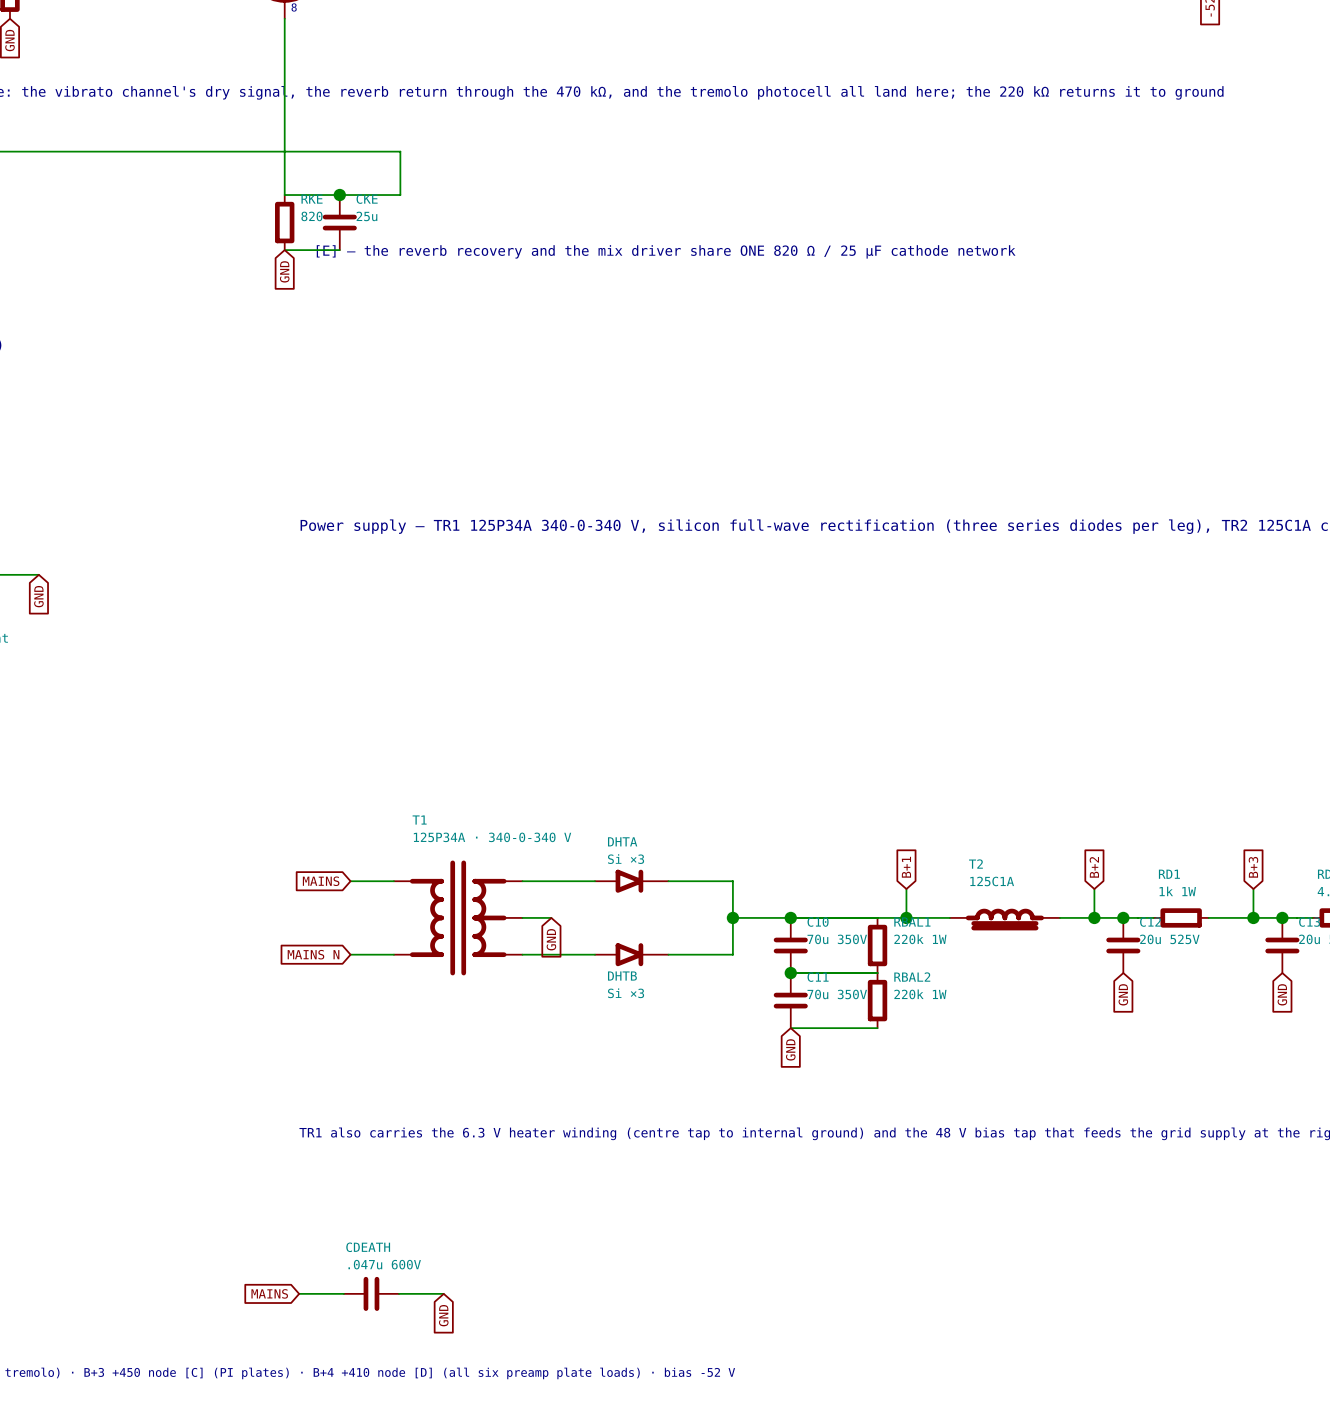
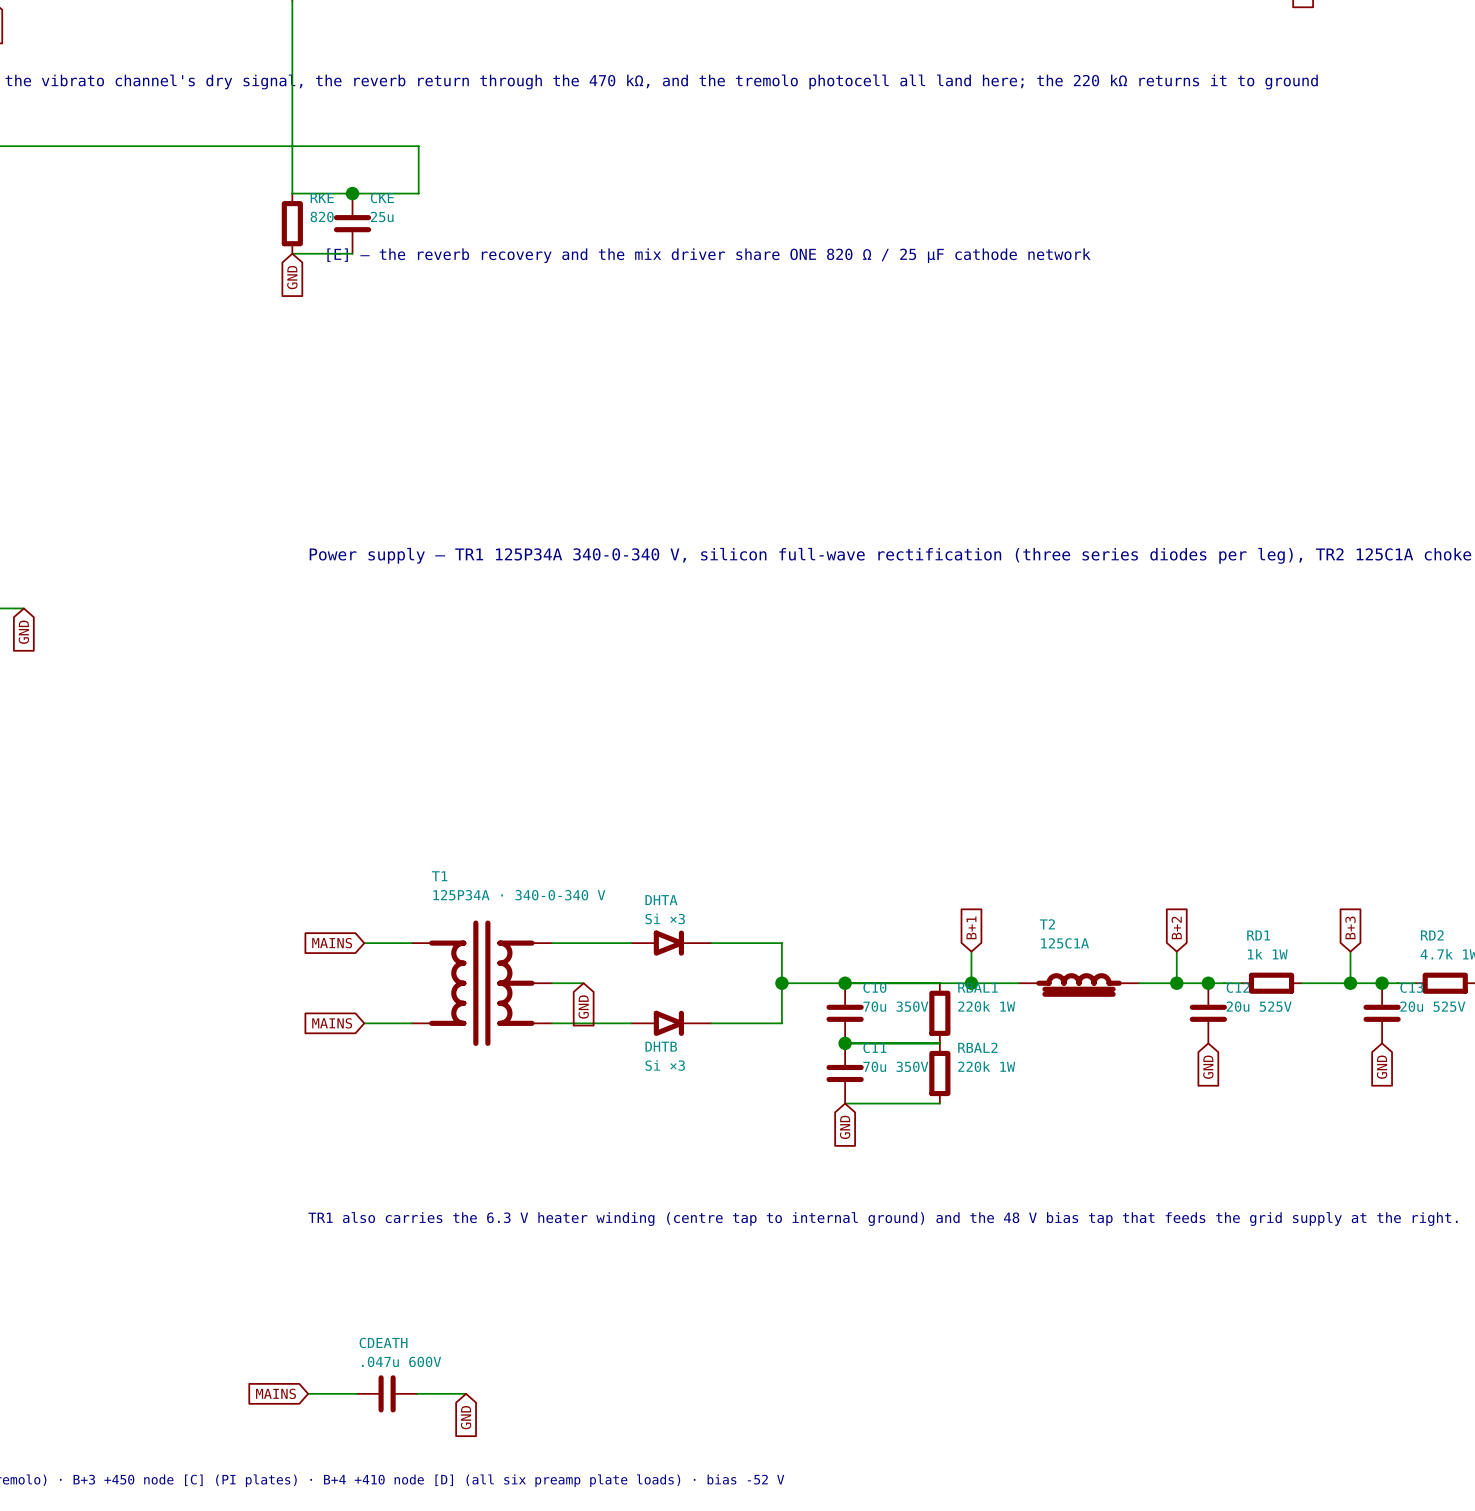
global label: MAINS N (313, 954) -> MAINS (332, 1023)

